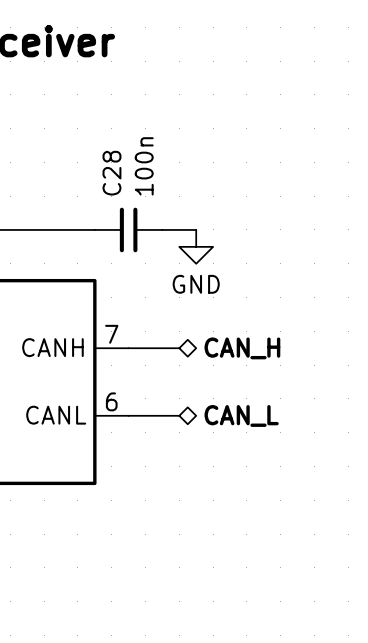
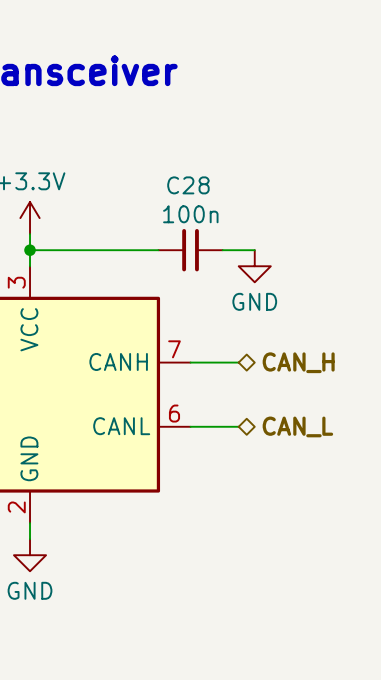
C28 value rotation: 0° (144, 166) -> 90° clockwise (190, 214)
C28 name rotation: 0° (111, 173) -> 90° clockwise (188, 185)

